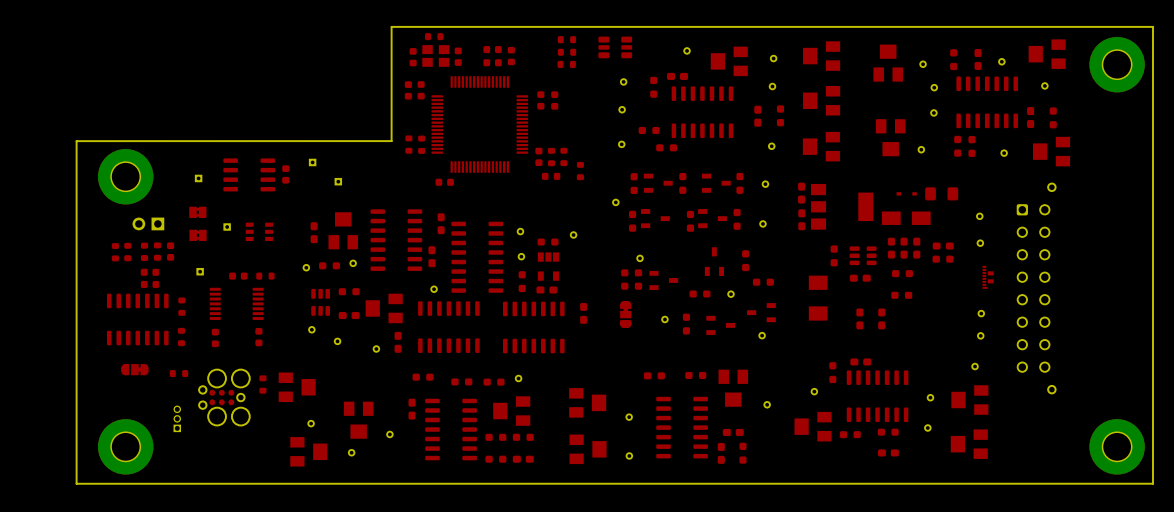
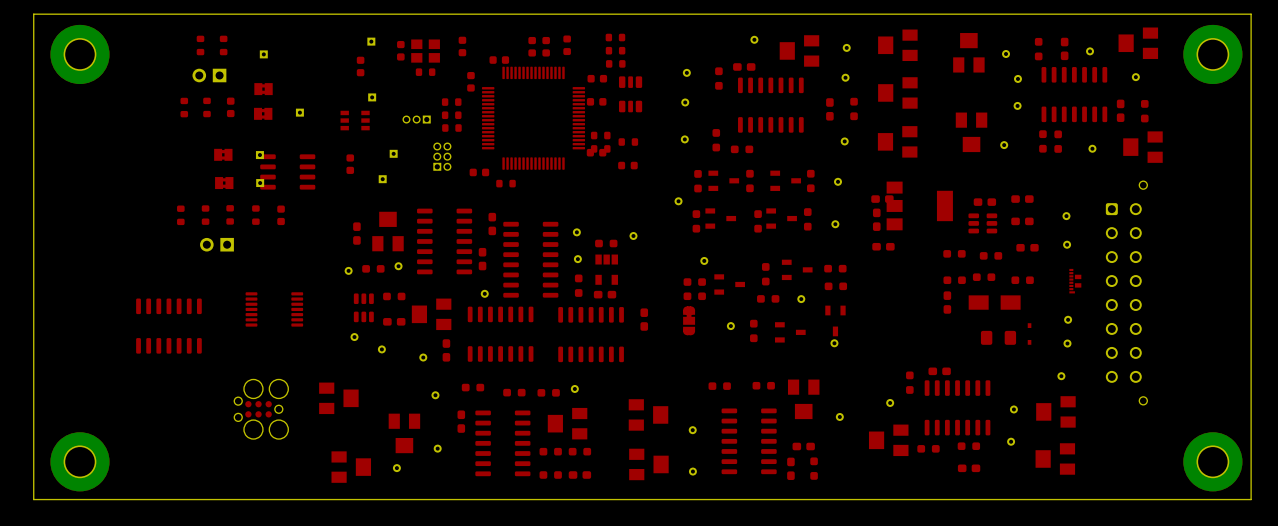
board edge: (391, 26) (391, 141) (76, 141) (76, 483) (1152, 482) -> (439, 14) (33, 14) (33, 499) (1251, 499)
part: (434, 36) -> none
part: (566, 39) -> none
part rotation: 0° (615, 47) -> 90° clockwise (630, 94)
part position: (615, 47) -> (630, 94)
part: none -> (615, 37)
part: (492, 49) -> none
part: none -> (371, 41)
part: (567, 52) -> none
part position: (435, 55) -> (425, 51)
part: none -> (200, 45)
part: none -> (223, 45)
part: (458, 56) -> none
part: none -> (532, 46)
part: none -> (546, 46)
part: none -> (400, 50)
part: none -> (615, 50)
part: (492, 62) -> none
part: none -> (263, 54)
part: (566, 64) -> none
part: none -> (499, 60)
part: none -> (615, 63)
part: none -> (360, 66)
part: none -> (425, 72)
part: none -> (209, 75)
part: none -> (597, 78)
part: (408, 90) -> none
part: none -> (263, 89)
part: (540, 100) -> none
part: (554, 100) -> none
part: none -> (372, 97)
part: none -> (451, 102)
part: none -> (596, 101)
part: none -> (184, 107)
part: none -> (206, 107)
part: none -> (230, 107)
part: none -> (299, 112)
part: none -> (263, 113)
part: none -> (451, 115)
part: none -> (416, 119)
part: (649, 130) -> none
part: none -> (451, 128)
part: none -> (600, 135)
part: (408, 144) -> none
part: (421, 144) -> none
part: none -> (716, 140)
part: none -> (628, 142)
part: (666, 147) -> none
part: none -> (600, 148)
part: none -> (742, 149)
part rotation: 0° (538, 156) -> 90° clockwise (596, 152)
part: (563, 156) -> none
part: none -> (393, 153)
part: (551, 157) -> none
part: none -> (223, 154)
part footprint: [308, 158, 317, 167] -> [346, 154, 355, 174]
part: none -> (259, 155)
part: none -> (442, 156)
part: (580, 171) -> none
part: (285, 174) -> none
part position: (125, 176) -> (79, 54)
part position: (551, 176) -> (627, 165)
part: (198, 178) -> none
part position: (444, 182) -> (479, 172)
part: none -> (224, 183)
part: none -> (260, 183)
part: none -> (505, 183)
part footprint: [925, 187, 959, 201] -> [1011, 195, 1034, 203]
part rotation: 0° (801, 193) -> 90° clockwise (882, 199)
part rotation: 0° (906, 193) -> 90° clockwise (1029, 333)
part position: (906, 193) -> (1029, 333)
part: none -> (984, 202)
part footprint: [189, 206, 207, 218] -> [226, 205, 234, 225]
part footprint: [881, 211, 931, 225] -> [968, 213, 998, 234]
part: none -> (180, 215)
part: none -> (205, 215)
part: none -> (255, 215)
part: none -> (281, 215)
part: none -> (1022, 221)
part position: (148, 223) -> (216, 244)
part: (227, 226) -> none
part position: (259, 231) -> (355, 120)
part: (198, 235) -> none
part: none -> (883, 246)
part: (891, 248) -> none
part: (904, 248) -> none
part: (916, 248) -> none
part: (144, 251) -> none
part: (157, 251) -> none
part: (170, 251) -> none
part: none -> (954, 253)
part: (115, 252) -> none
part: (127, 252) -> none
part: none -> (990, 255)
part: (834, 255) -> none
part: (863, 255) -> none
part: (943, 259) -> none
part rotation: 0° (745, 260) -> 90° clockwise (835, 268)
part position: (745, 260) -> (835, 268)
part rotation: 0° (714, 261) -> 90° clockwise (797, 269)
part: none -> (765, 274)
part: (200, 271) -> none
part: (149, 272) -> none
part: (631, 272) -> none
part: (238, 276) -> none
part: (265, 276) -> none
part: none -> (954, 280)
part: none -> (1022, 280)
part: none -> (694, 282)
part: (860, 278) -> none
part: (150, 284) -> none
part: (631, 286) -> none
part: none -> (694, 296)
part: (901, 295) -> none
part: none -> (947, 302)
part: none -> (994, 302)
part: (818, 298) -> none
part: (181, 306) -> none
part rotation: 0° (761, 312) -> 90° counterclockwise (835, 320)
part: (859, 318) -> none
part: (881, 318) -> none
part: none -> (998, 337)
part: (181, 337) -> none
part: (215, 337) -> none
part: (258, 337) -> none
part: (134, 369) -> none
part: (178, 373) -> none
part: (262, 384) -> none
part: (177, 418) -> none
part position: (311, 423) -> (435, 395)
part position: (125, 446) -> (79, 461)

